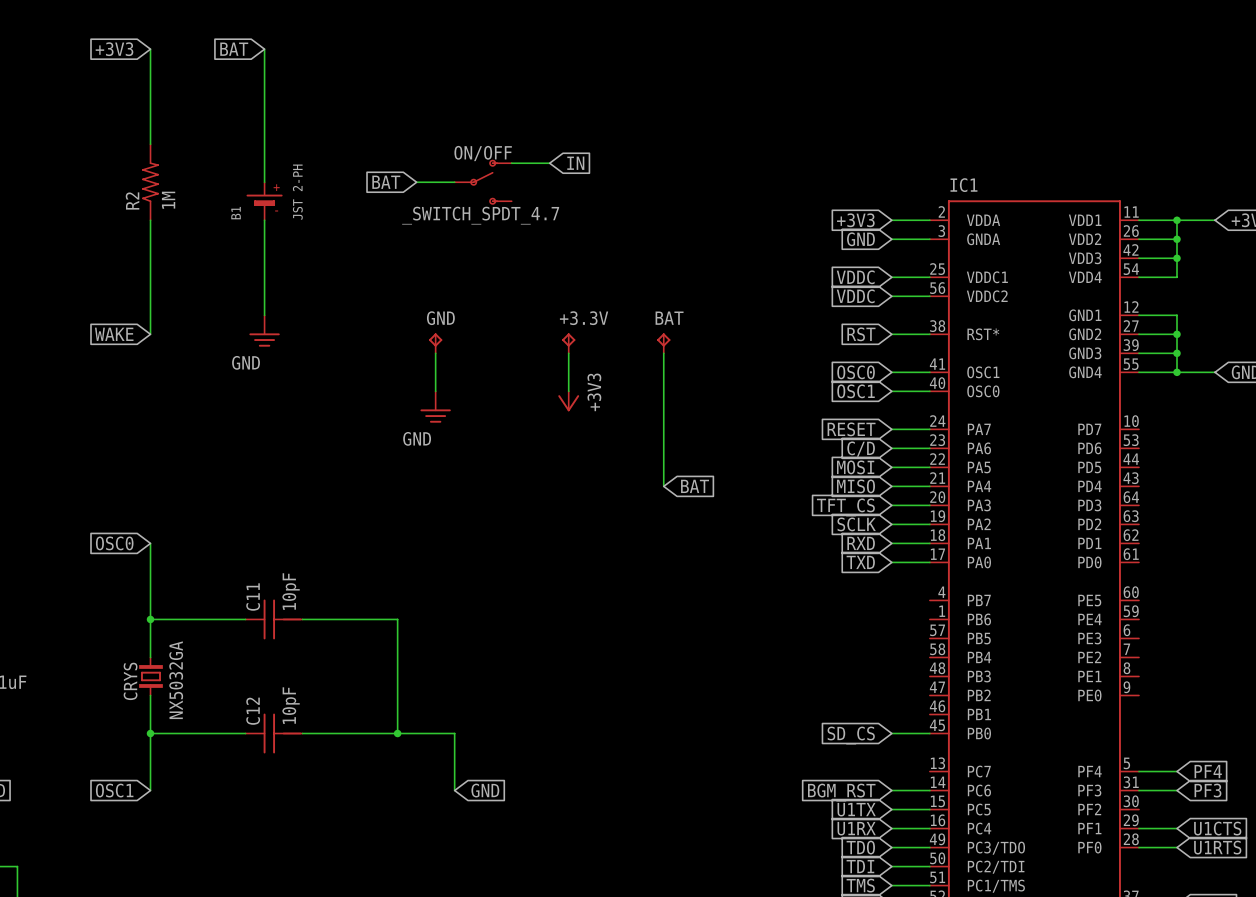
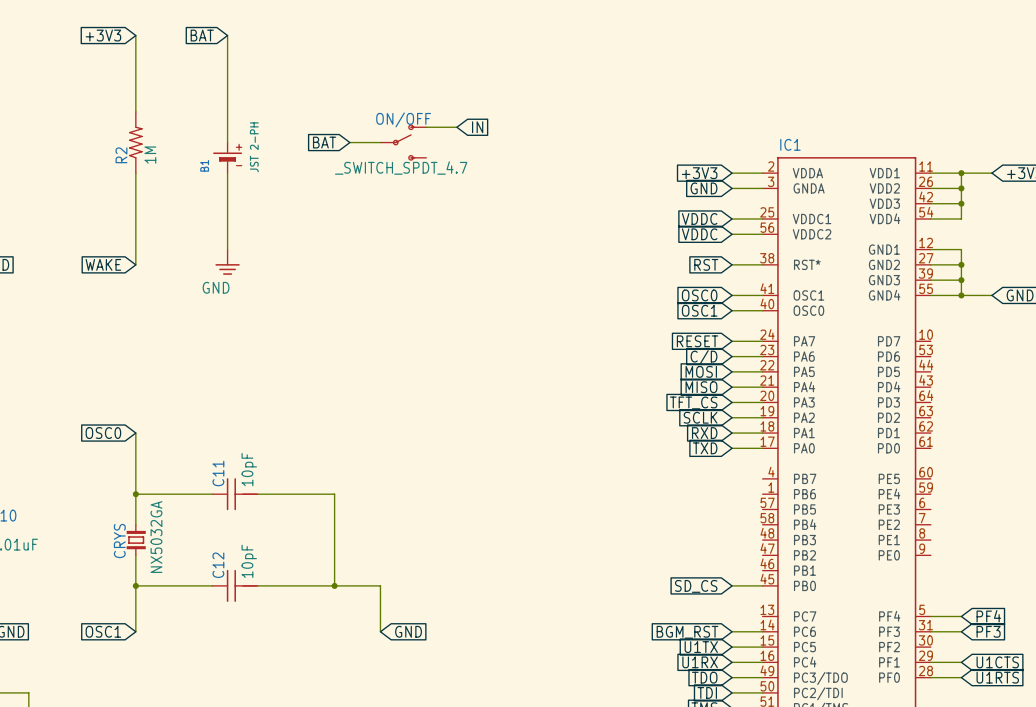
GND: (435, 343) -> none
+3.3V: (568, 343) -> none
BAT: (663, 343) -> none
wire: (435, 353) (435, 391) -> none
wire: (568, 353) (568, 391) -> none
wire: (663, 353) (663, 486) -> none
power symbol: +3V3 (568, 401) -> none
power symbol: GND (435, 407) -> none
global label: BAT (695, 486) -> none

